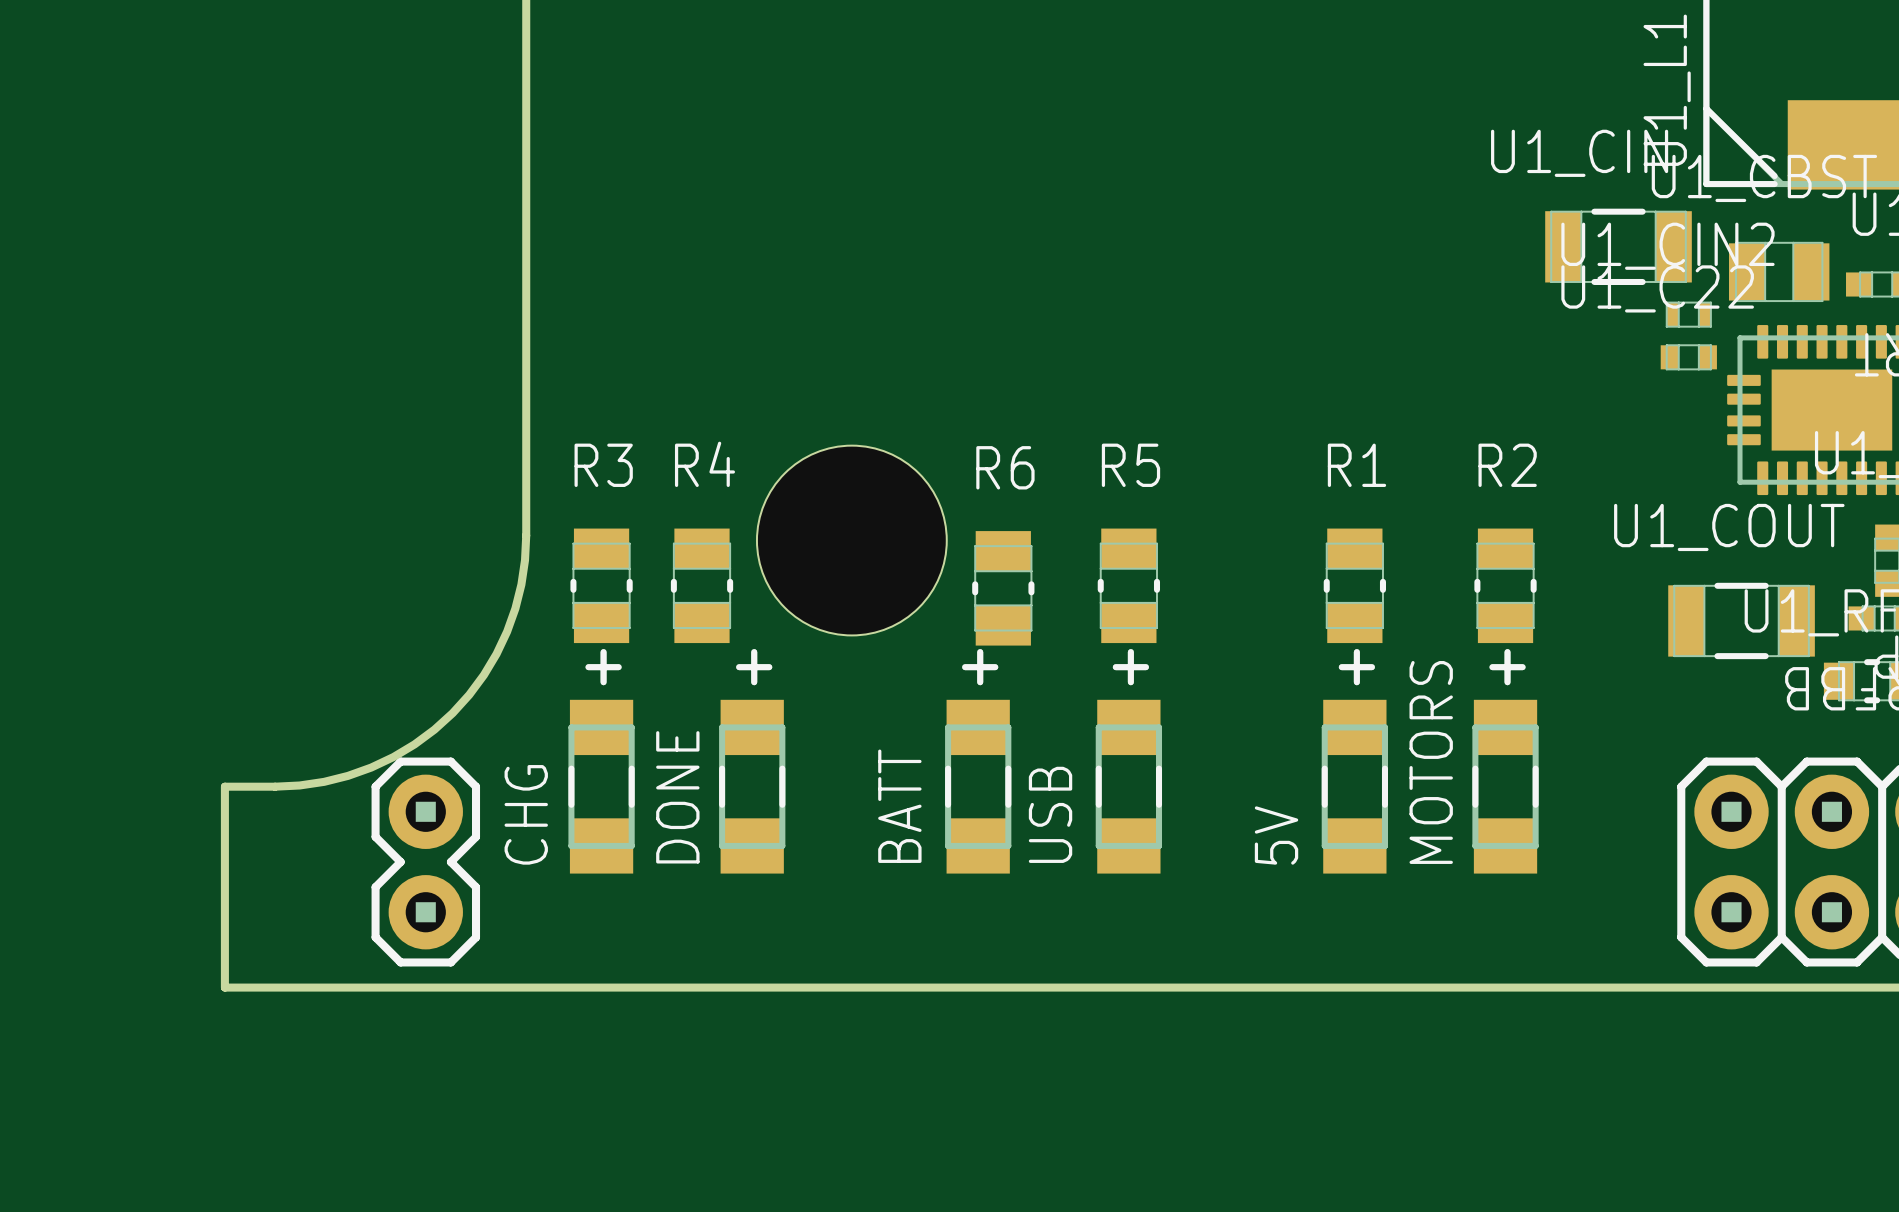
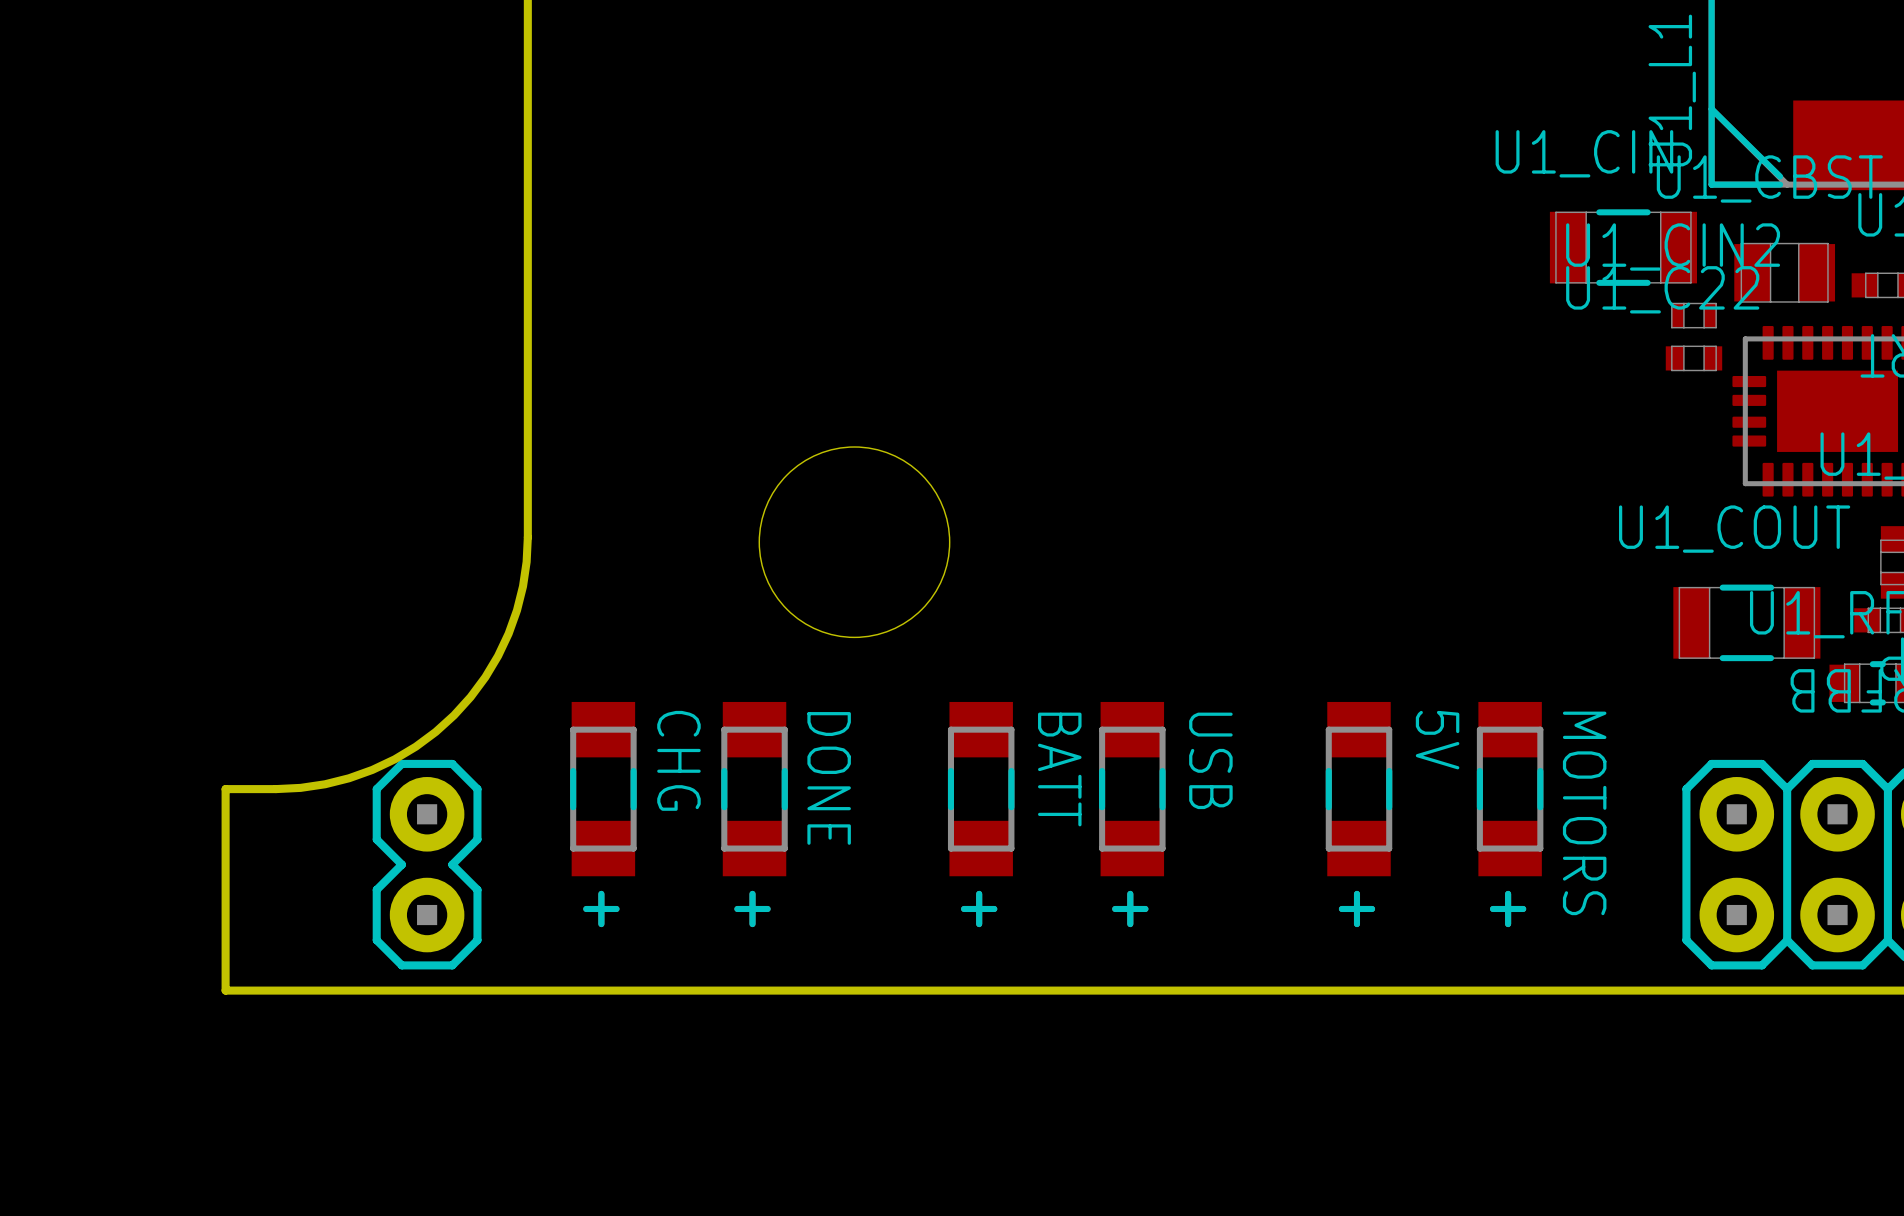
R3: (601, 585) -> none
R4: (702, 585) -> none
R5: (1128, 585) -> none
R1: (1354, 585) -> none
R2: (1505, 585) -> none
R6: (1003, 588) -> none
CHG rotation: 0° (601, 761) -> 180° (603, 814)
DONE rotation: 0° (752, 761) -> 180° (754, 814)
BATT rotation: 0° (978, 761) -> 180° (981, 814)
USB rotation: 0° (1128, 761) -> 180° (1132, 814)
5V rotation: 0° (1354, 761) -> 180° (1359, 814)
MOTORS rotation: 0° (1505, 761) -> 180° (1510, 814)

